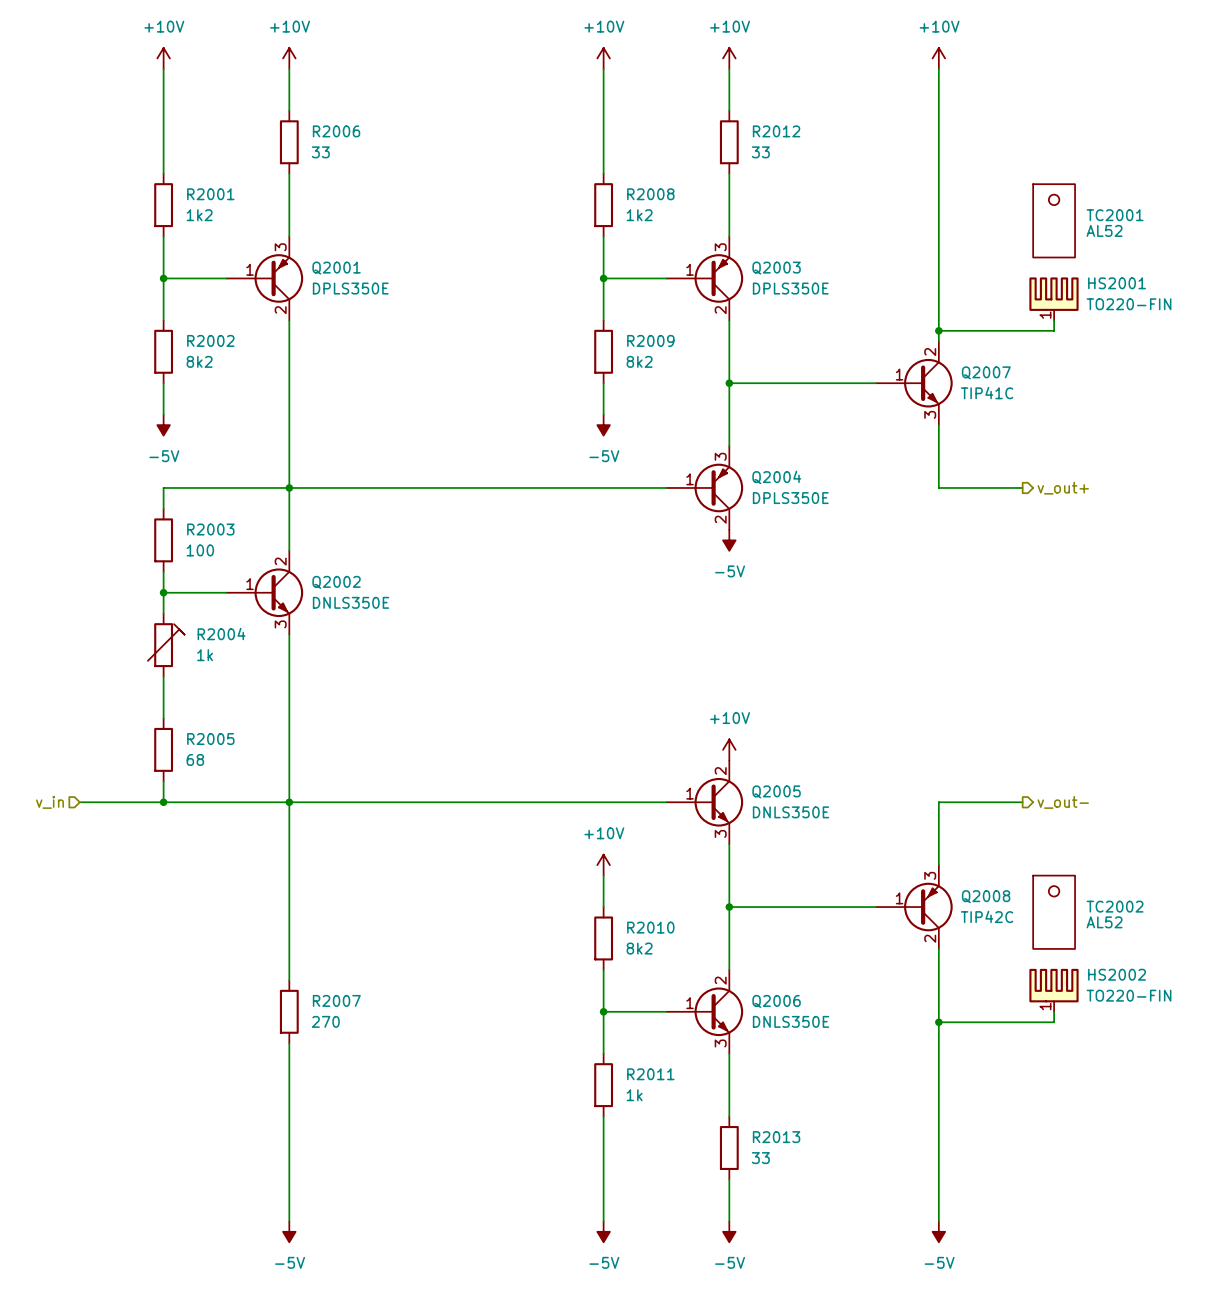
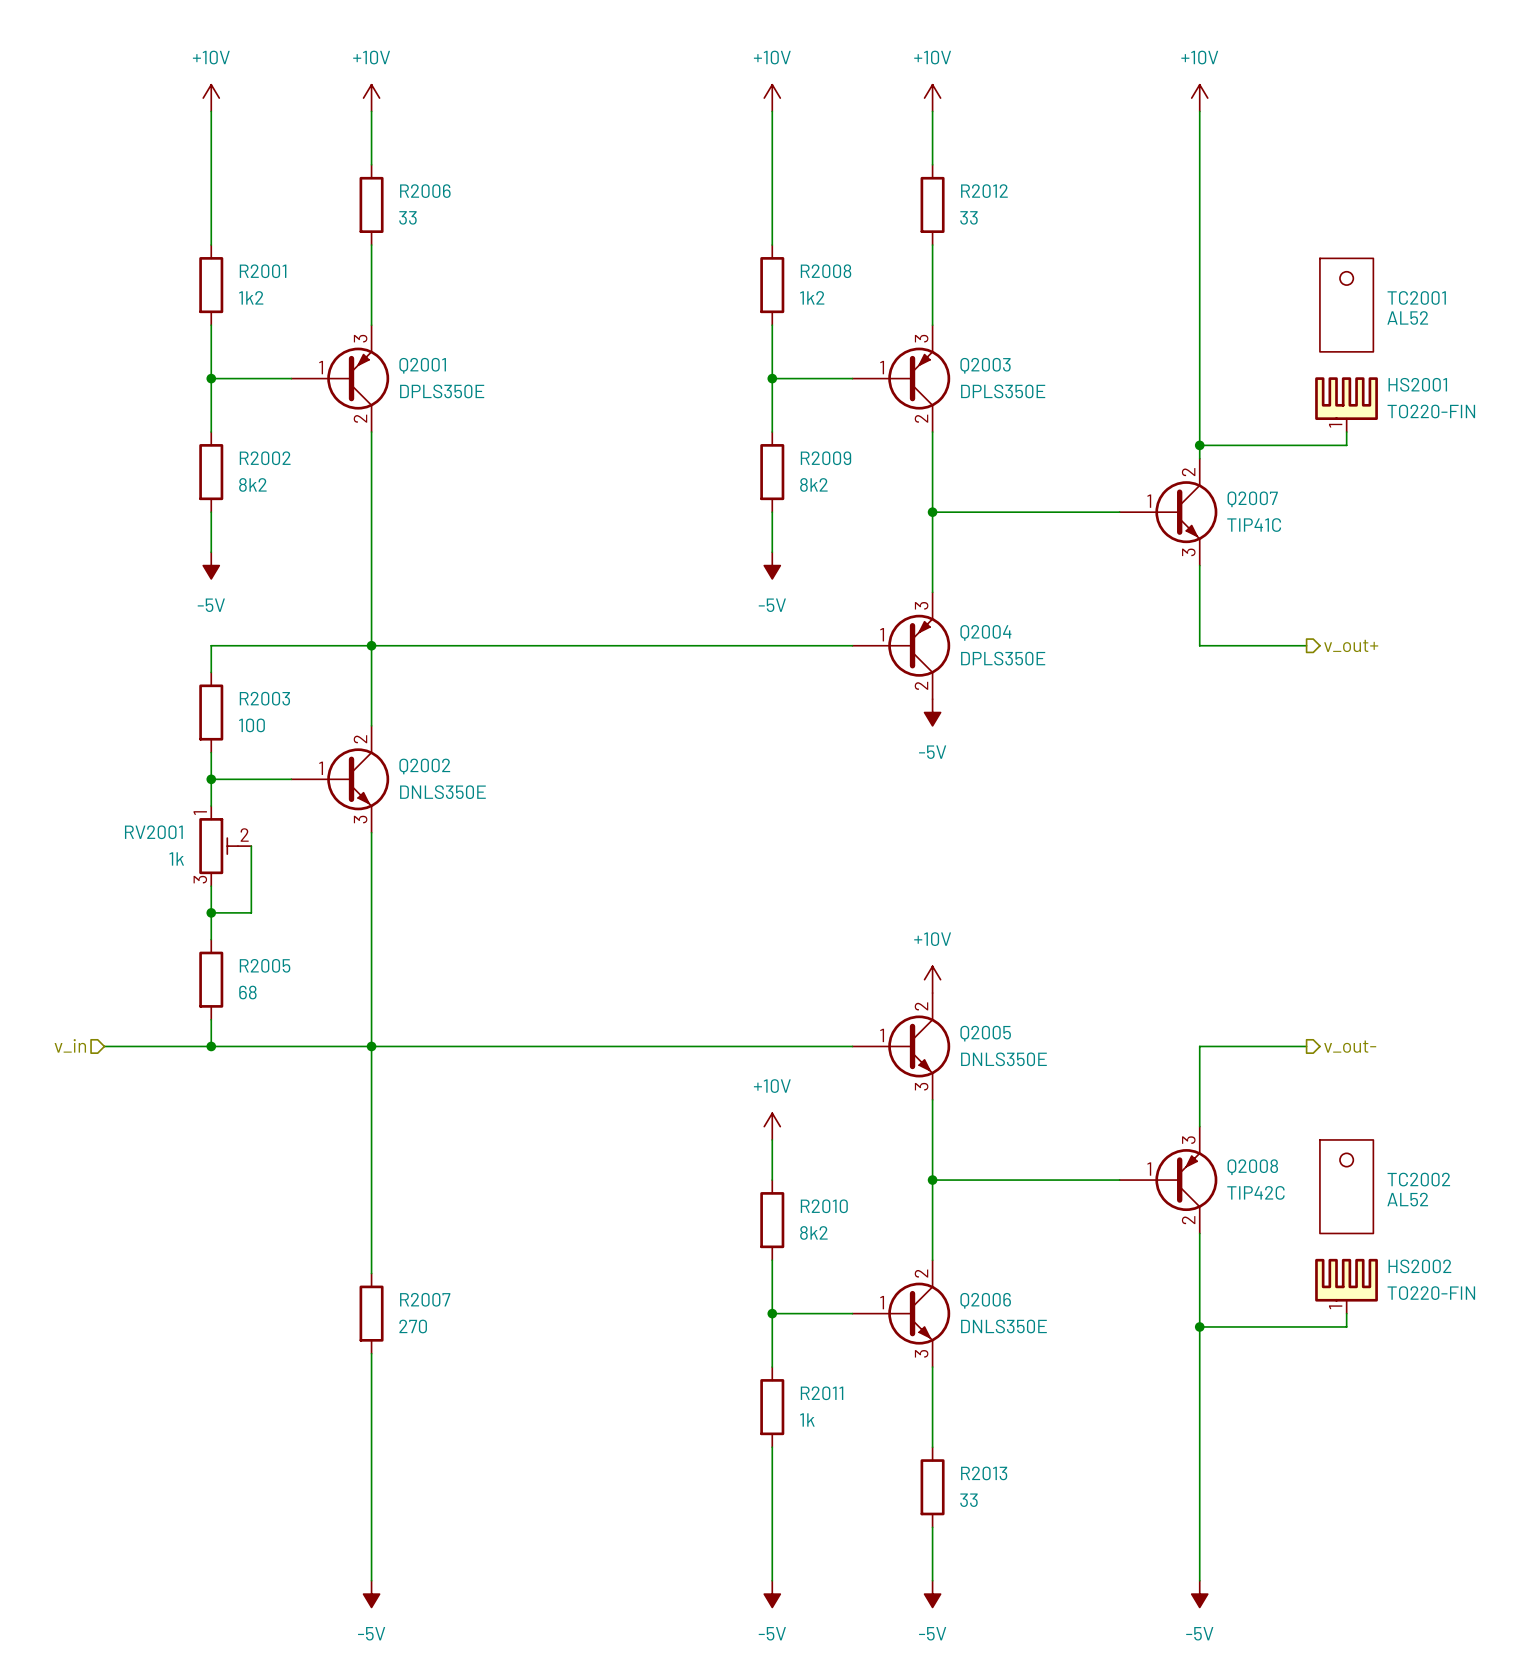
R2004: 1k (166, 645) -> none
RV2001: none -> 1k (225, 846)
wire: none -> (251, 846) (251, 912) (211, 912)
junction: none -> (211, 912)

